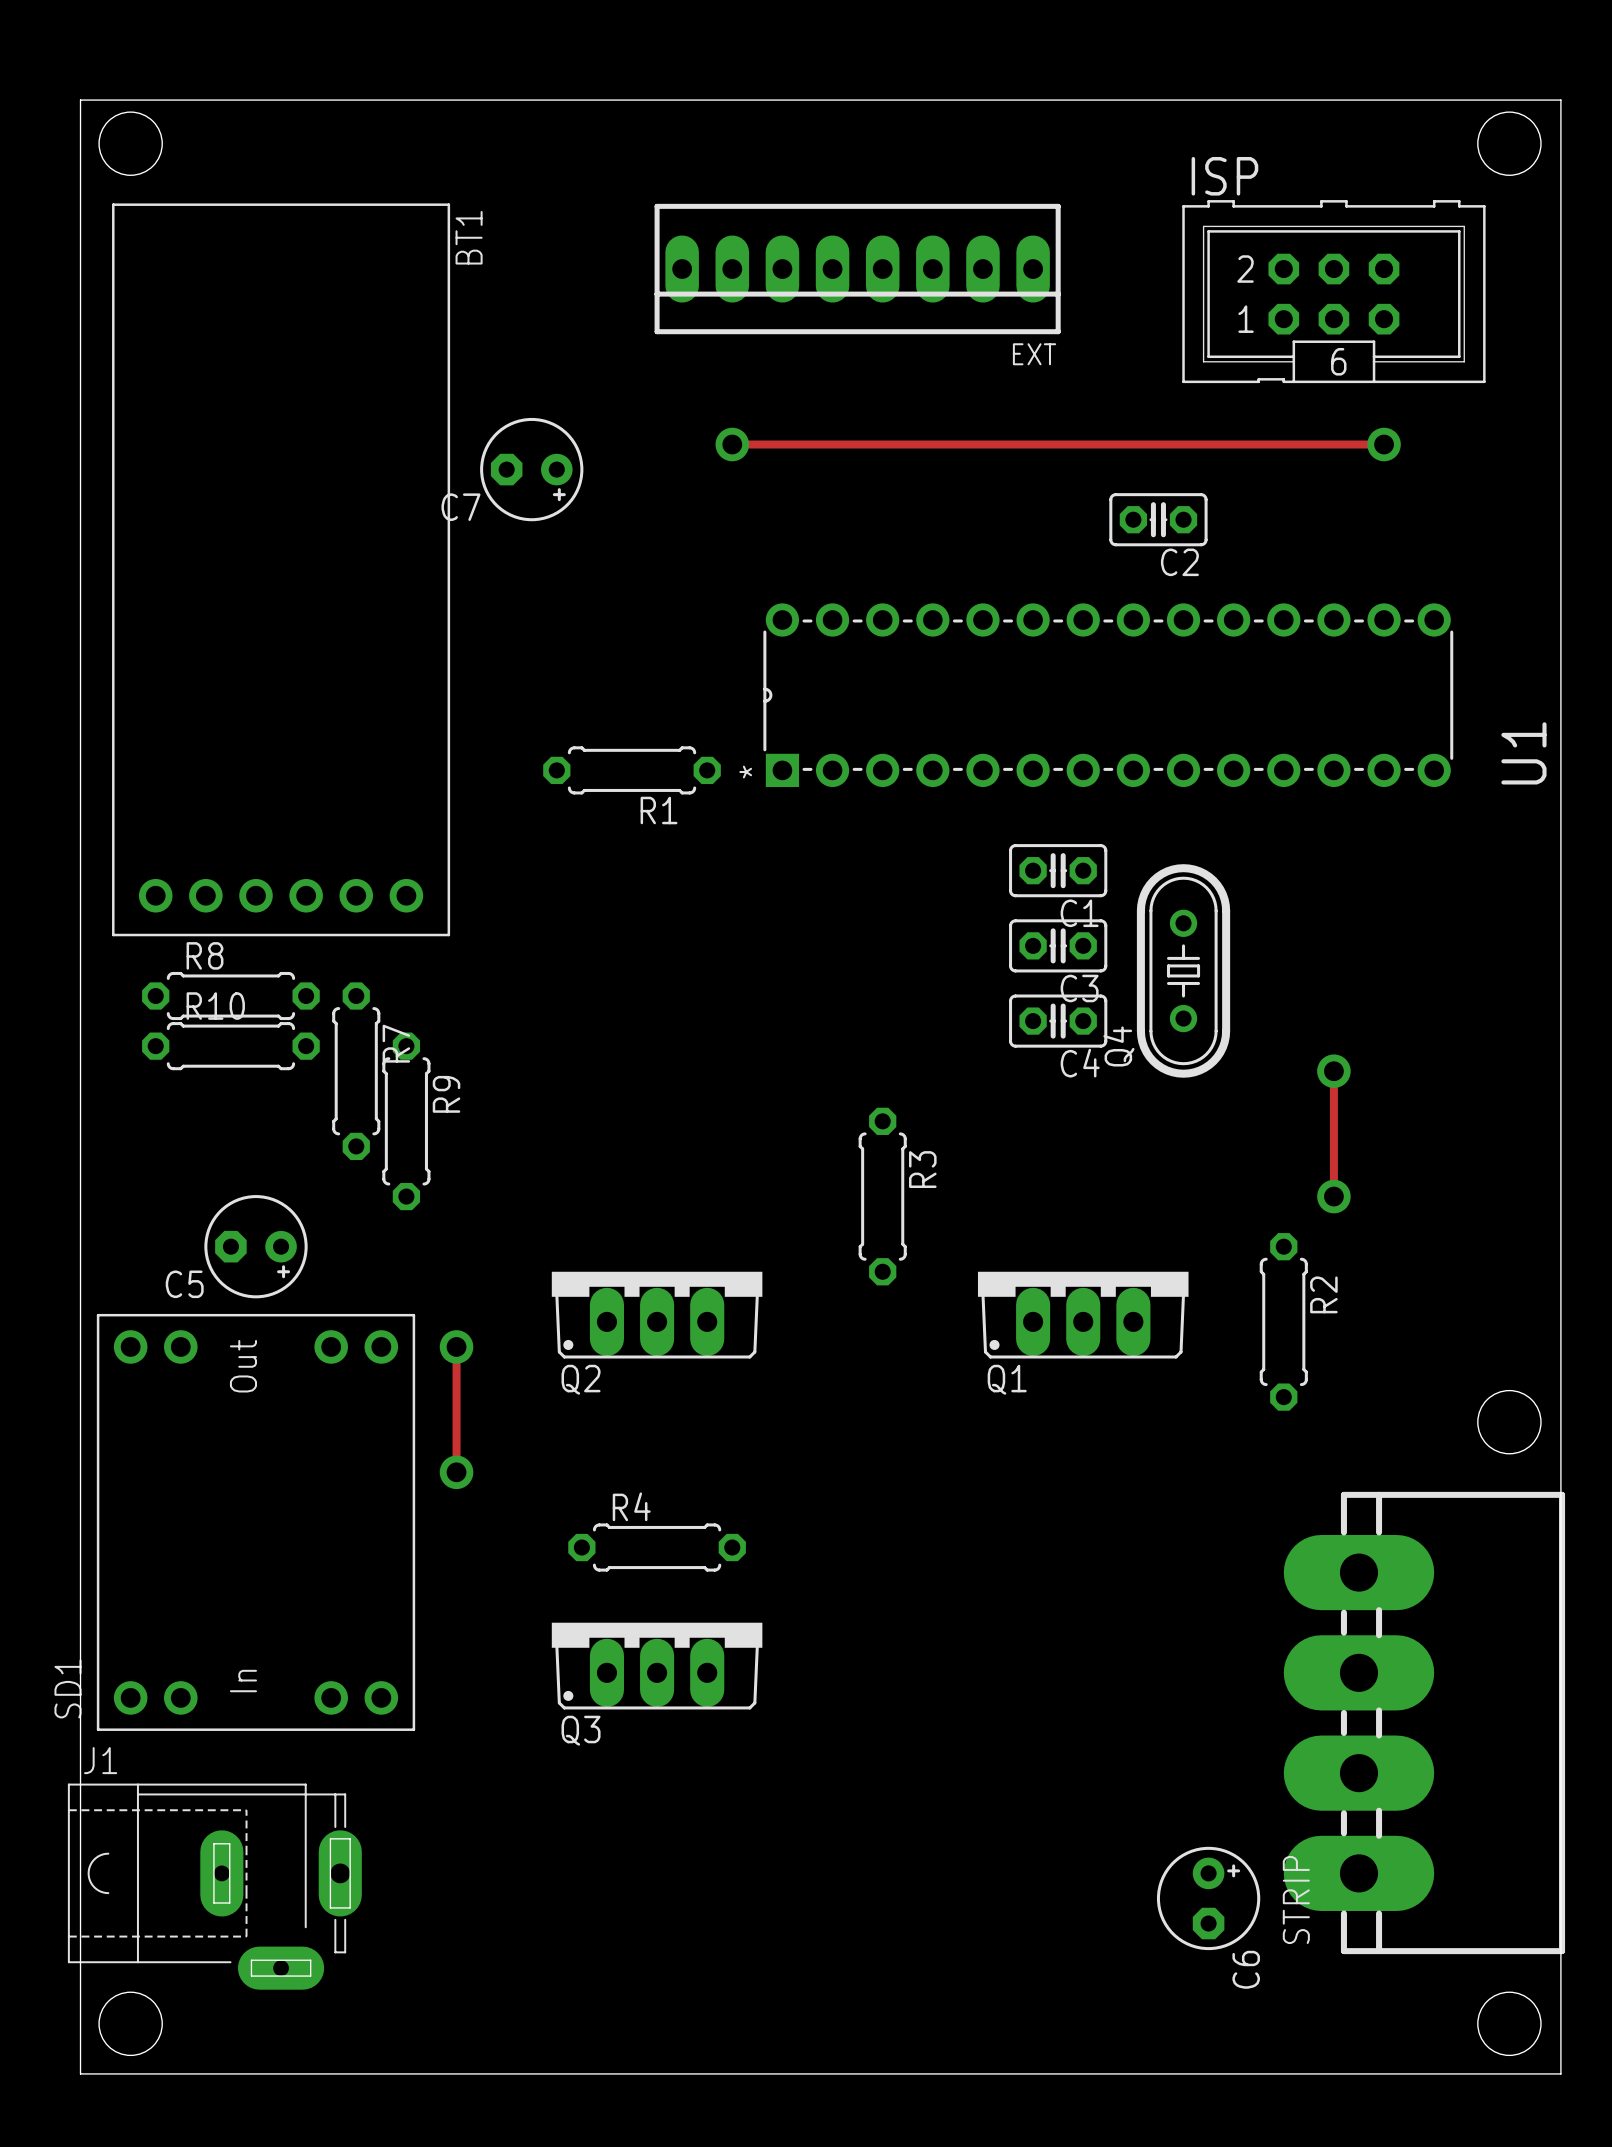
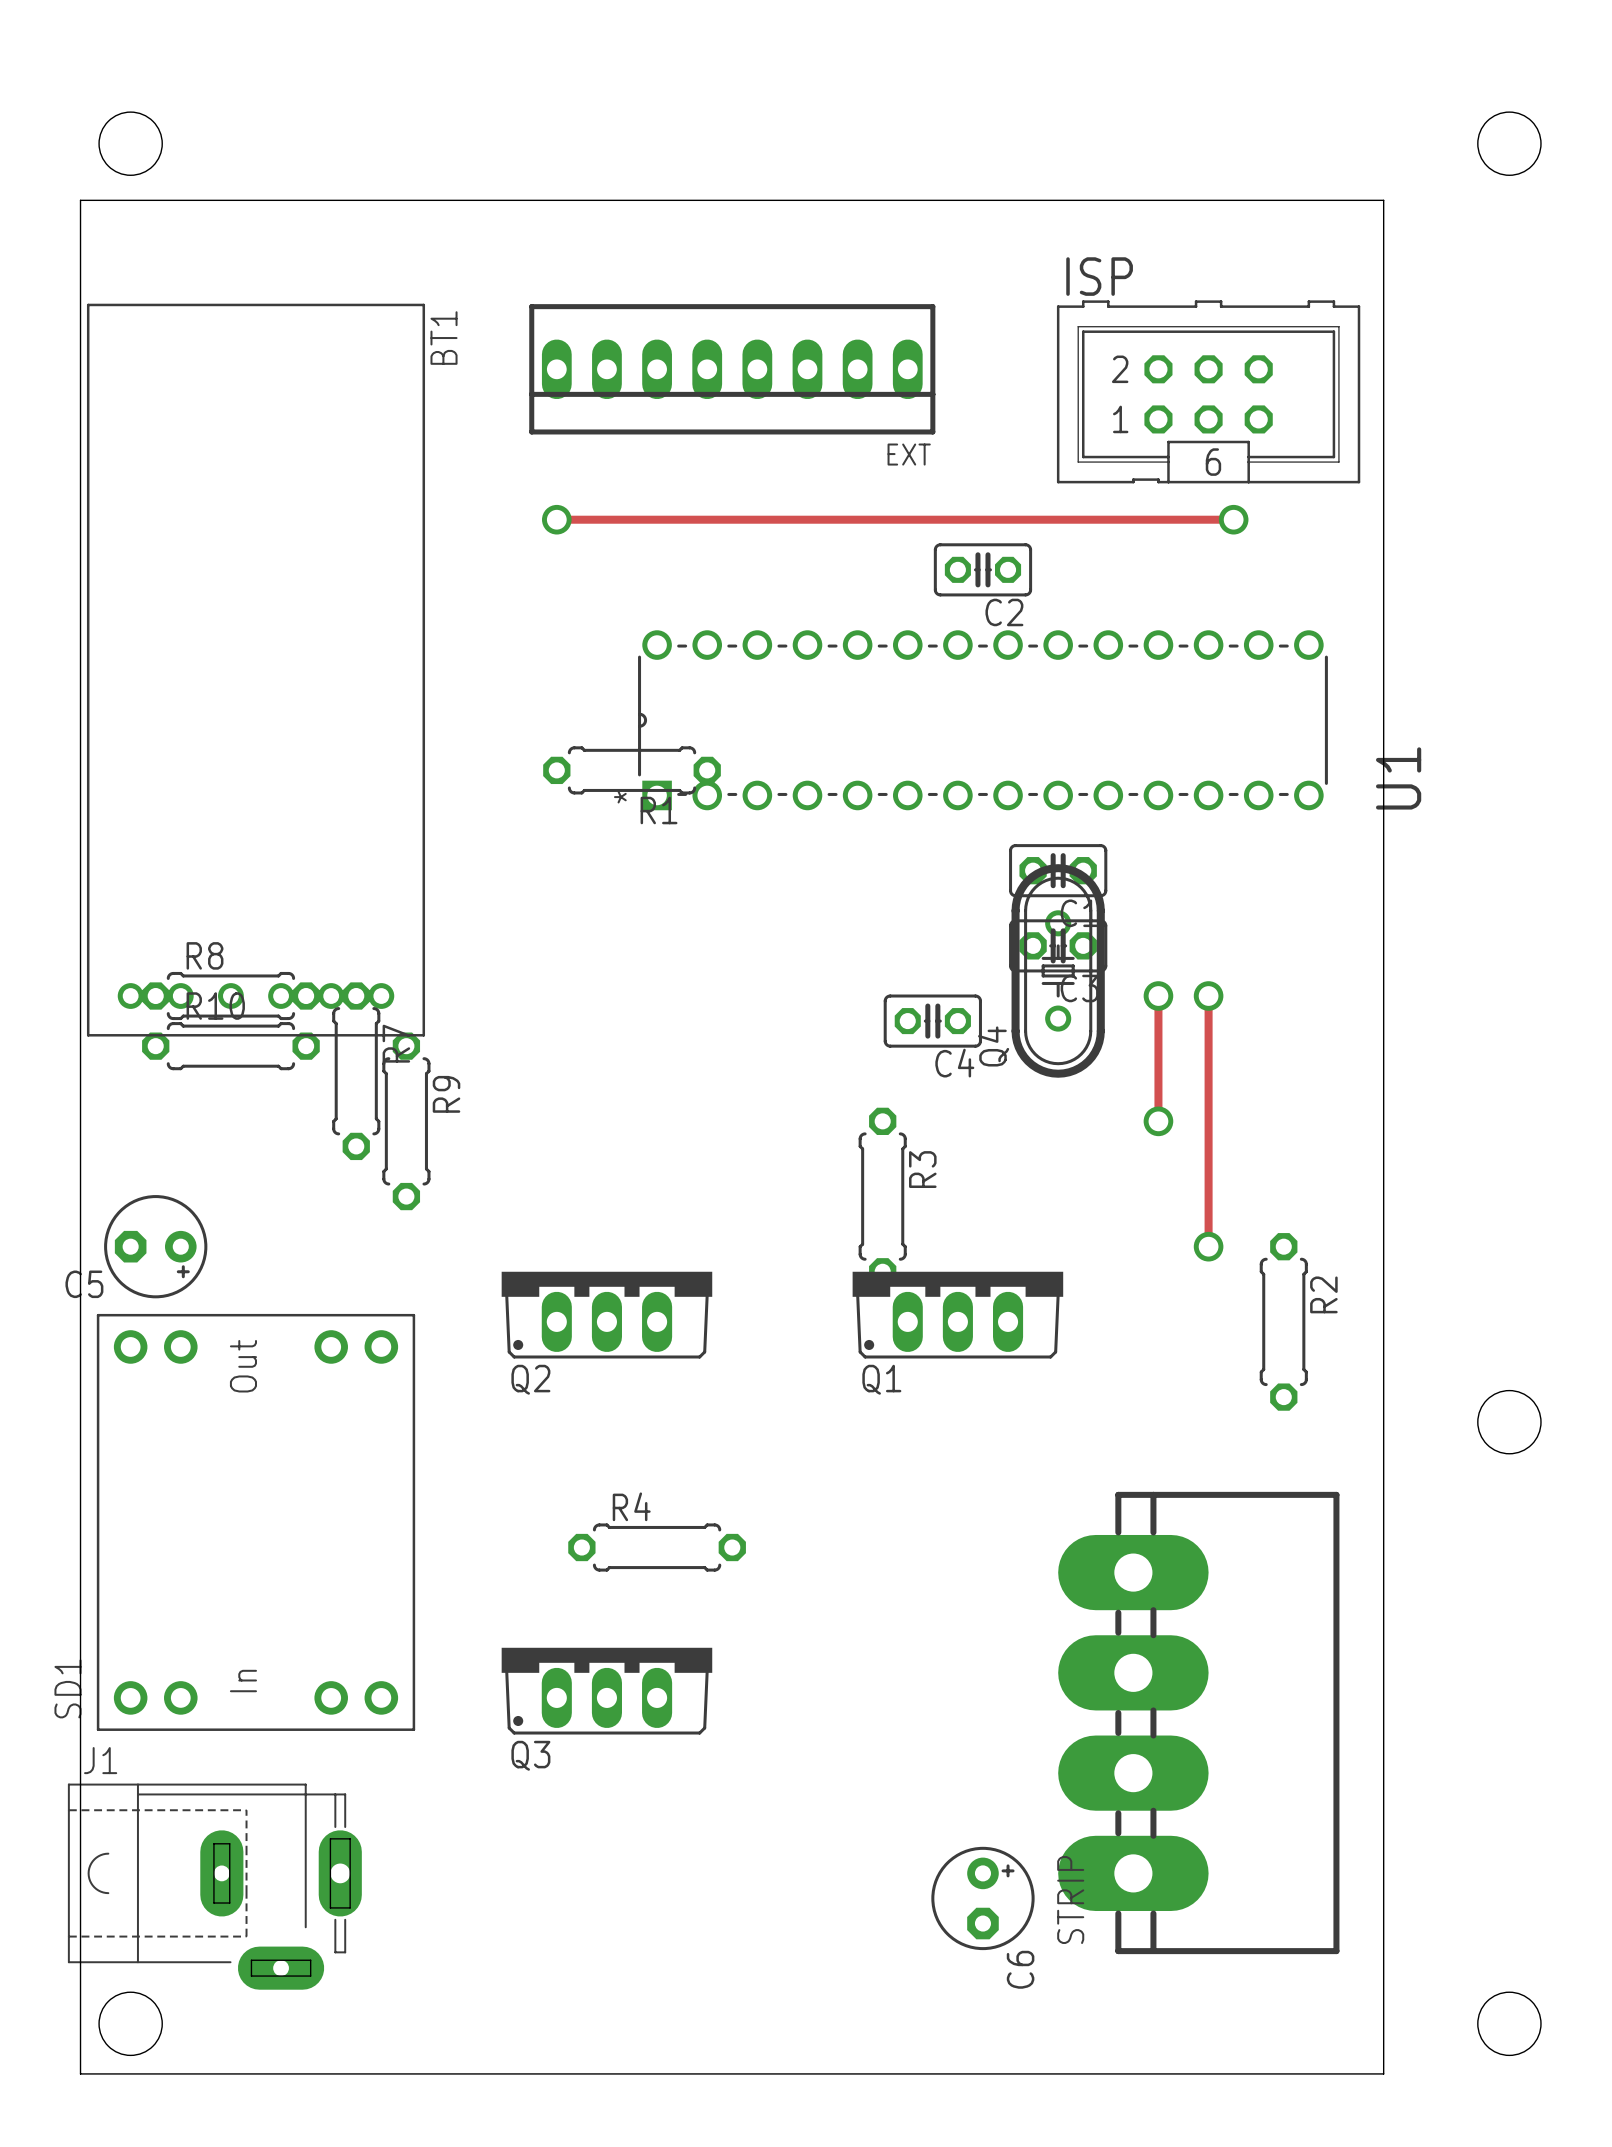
board edge: (80, 200) (80, 100) (1560, 100) (1560, 2073) (1383, 2073) -> (80, 200) (1383, 200) (1383, 2073)
BT1 footprint: [112, 203, 451, 937] -> [86, 303, 426, 1037]
EXT: (857, 269) -> none
ISP: (1333, 291) -> none
EXT: none -> (732, 369)
ISP: none -> (1208, 391)
track: (732, 444) (1384, 444) -> none
via: (732, 444) -> none
via: (1384, 444) -> none
C7: (531, 469) -> none
C2 footprint: [1109, 493, 1208, 547] -> [933, 543, 1033, 597]
track: none -> (556, 519) (1233, 519)
via: none -> (556, 519)
via: none -> (1233, 519)
U1 footprint: [763, 603, 1454, 788] -> [638, 630, 1328, 811]
Q4 footprint: [1136, 864, 1231, 1078] -> [1011, 864, 1105, 1078]
C4 footprint: [1009, 994, 1108, 1048] -> [883, 994, 982, 1048]
via: none -> (1158, 996)
track: none -> (1208, 996) (1208, 1246)
via: none -> (1208, 996)
track: (1333, 1071) (1333, 1196) -> (1158, 996) (1158, 1121)
via: (1333, 1071) -> none
via: none -> (1158, 1121)
via: (1333, 1196) -> none
C5 position: (255, 1246) -> (155, 1246)
via: none -> (1208, 1246)
Q2 footprint: [551, 1271, 763, 1359] -> [501, 1271, 713, 1359]
Q1 footprint: [977, 1271, 1189, 1359] -> [852, 1271, 1064, 1359]
track: (456, 1346) (456, 1472) -> none
via: (456, 1346) -> none
via: (456, 1472) -> none
Q3 footprint: [551, 1622, 763, 1710] -> [501, 1647, 713, 1735]
STRIP position: (1424, 1722) -> (1198, 1722)
C6 position: (1208, 1898) -> (982, 1898)

